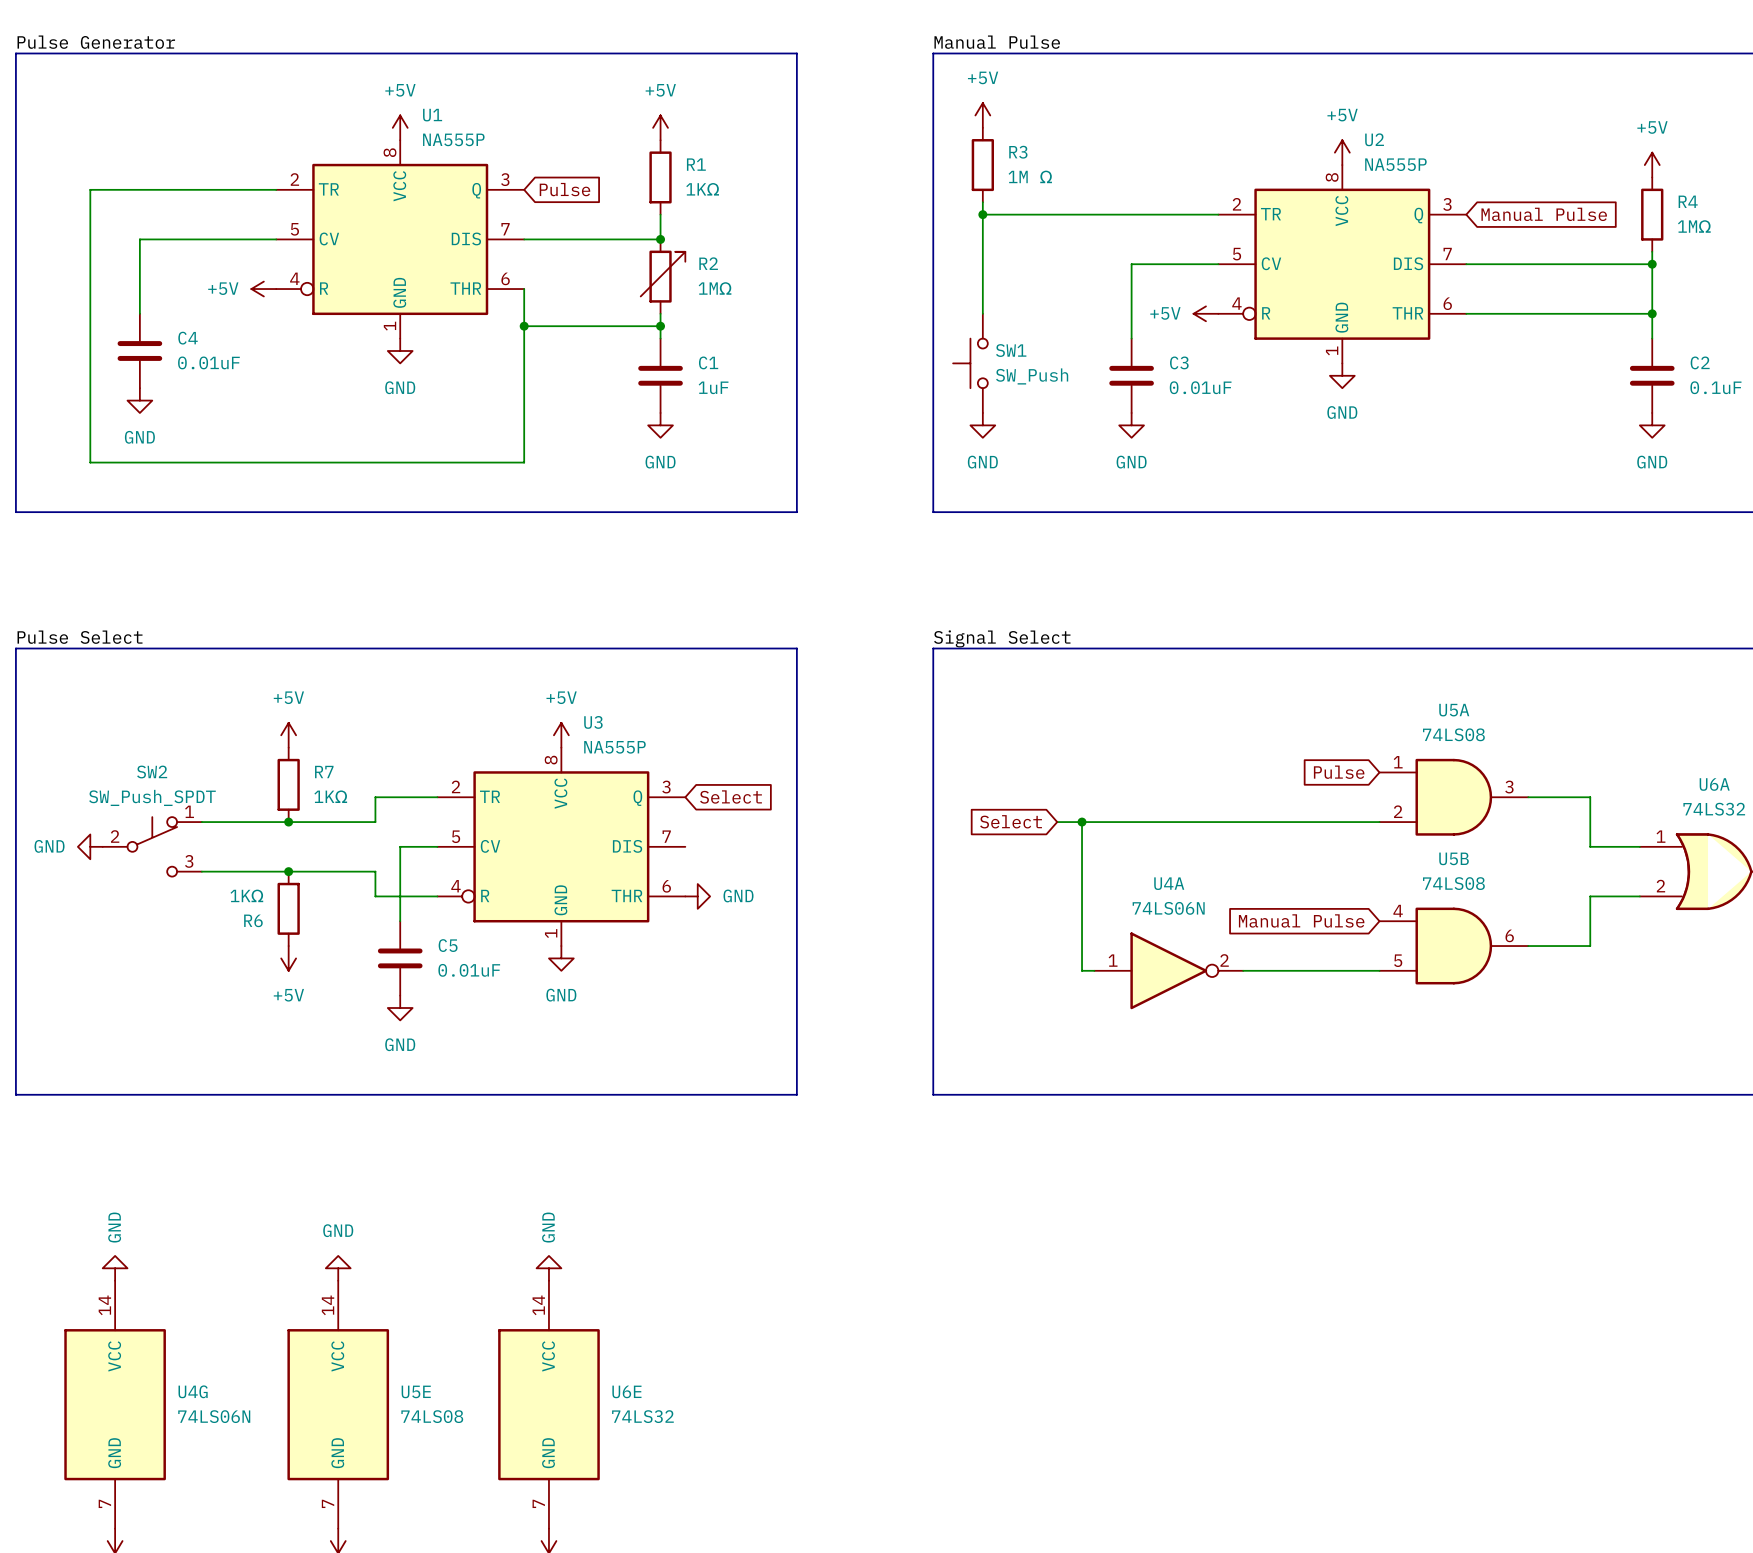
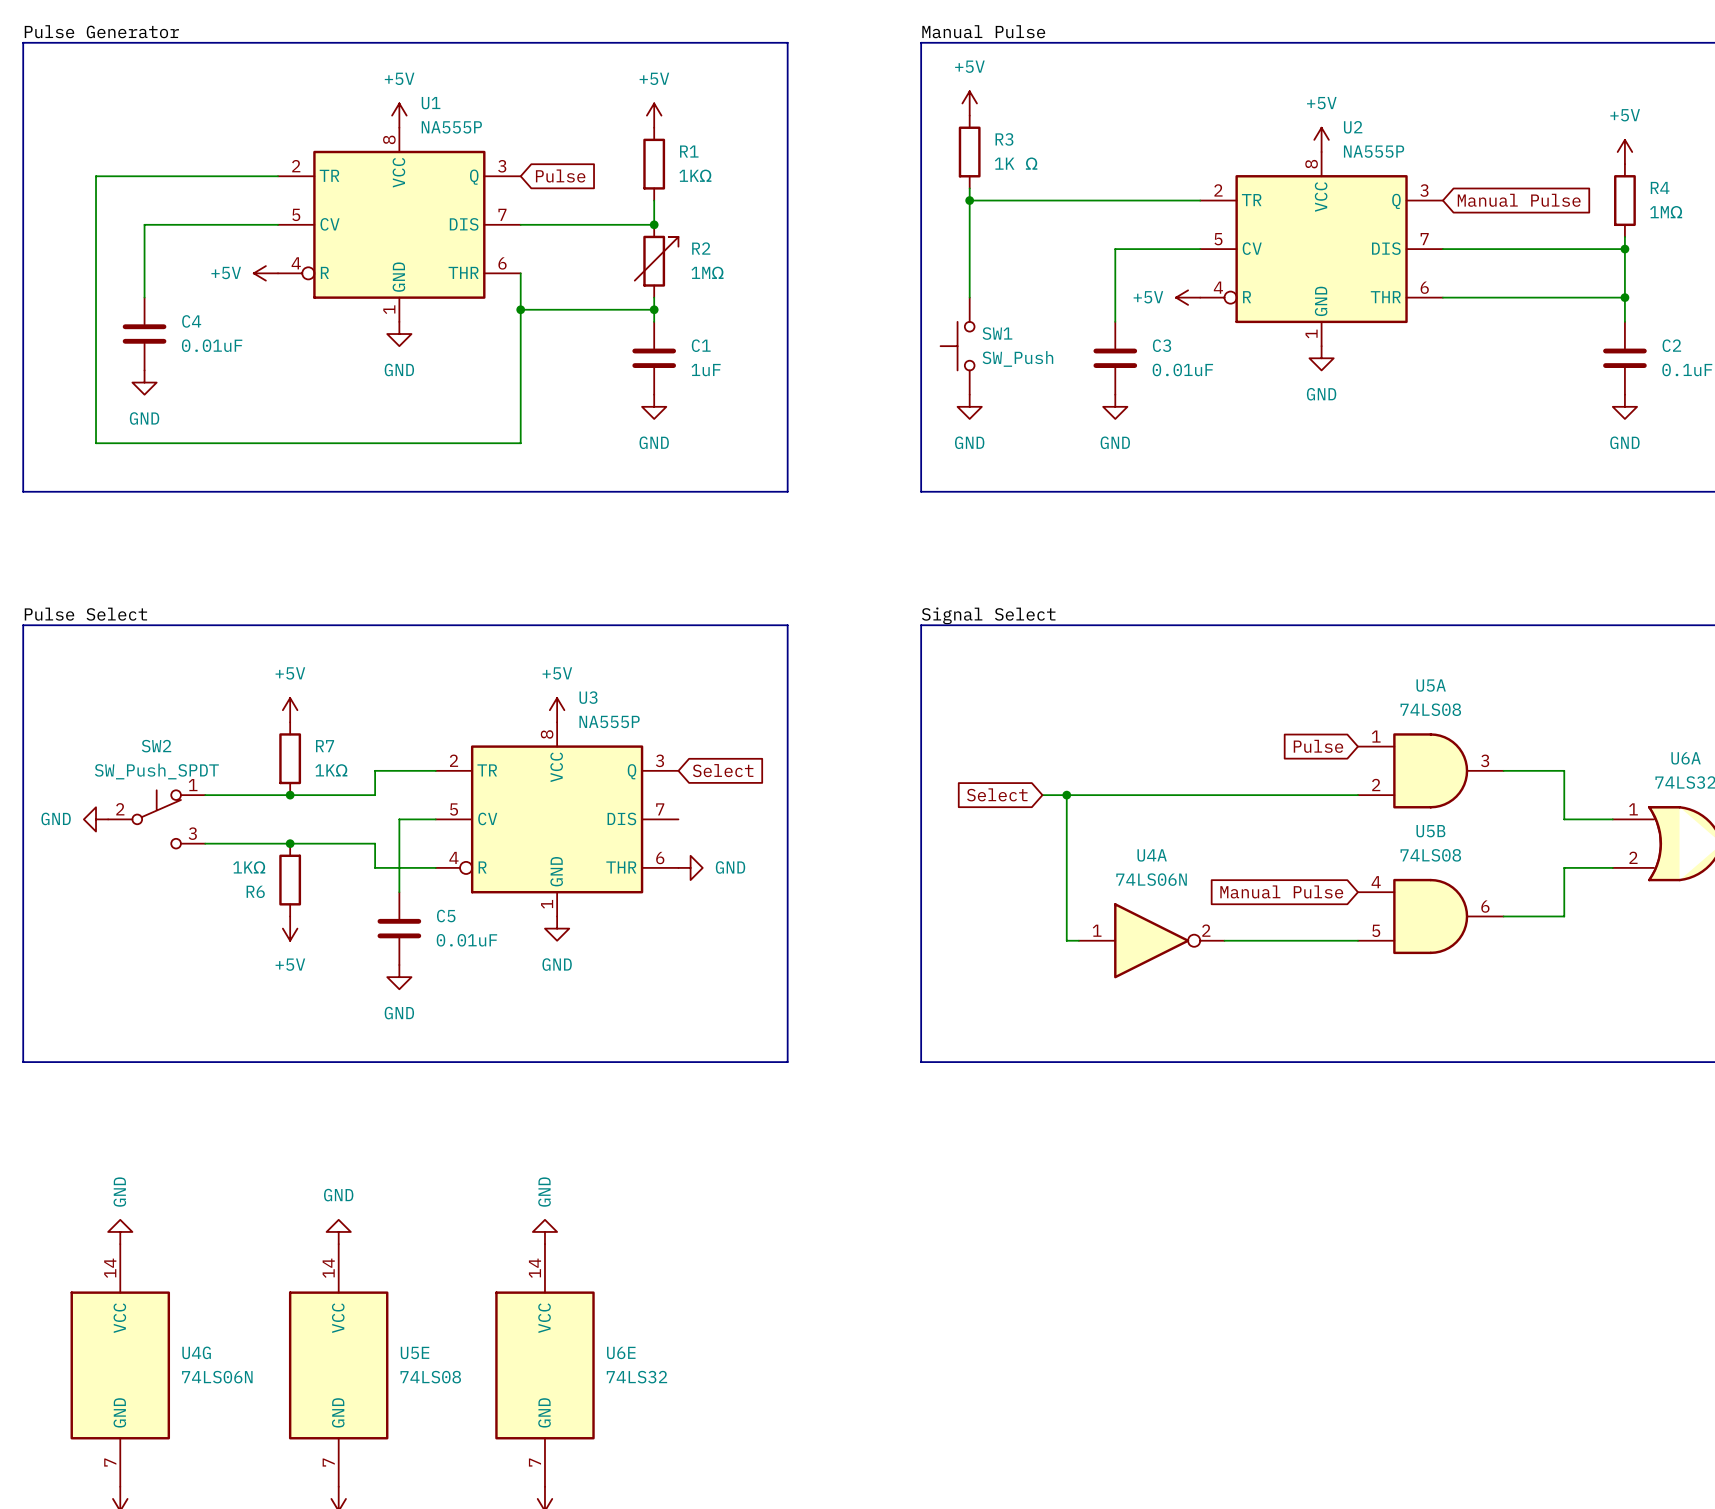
R3 value: 1M Ω (1030, 176) -> 1K Ω (1016, 163)

